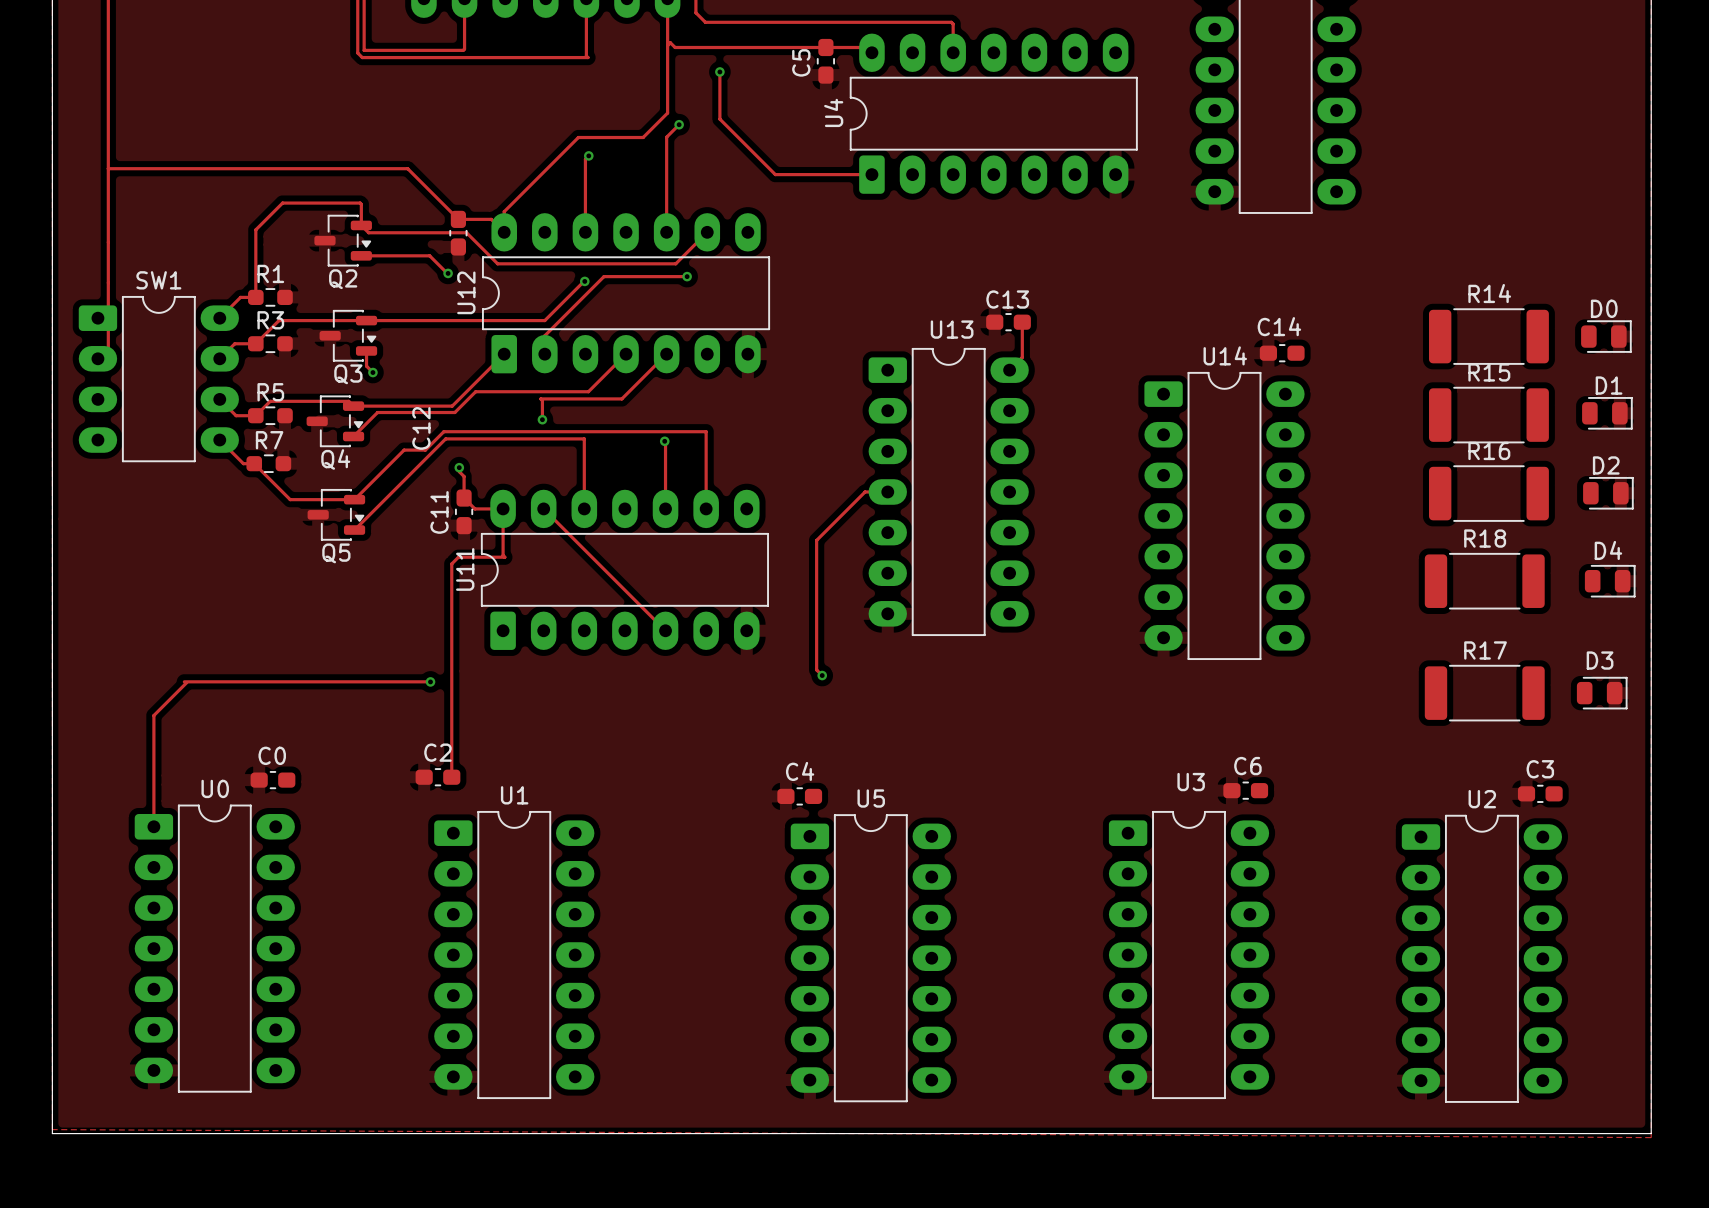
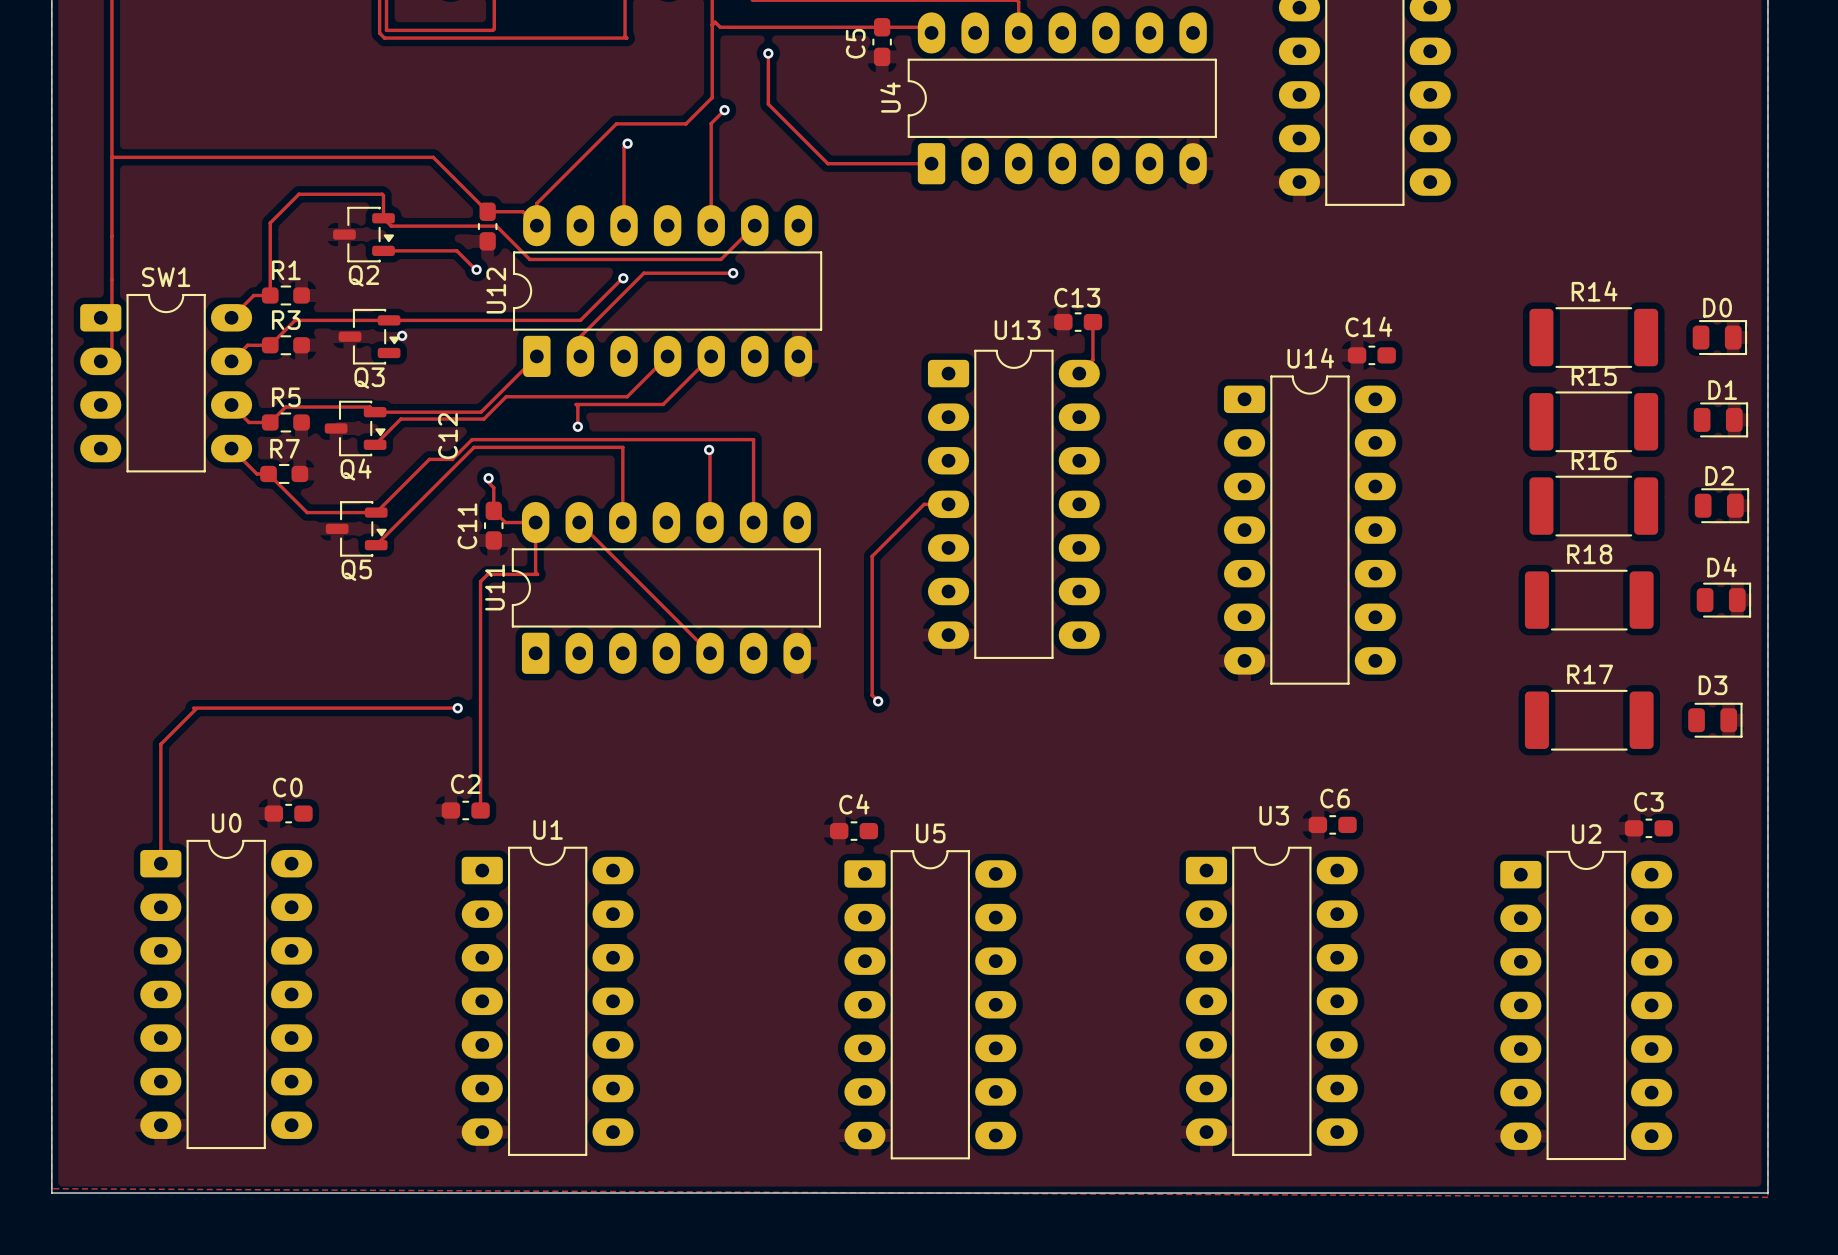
track: (366, 350) (366, 366) (372, 372) -> none
via position: (372, 372) -> (402, 335)

